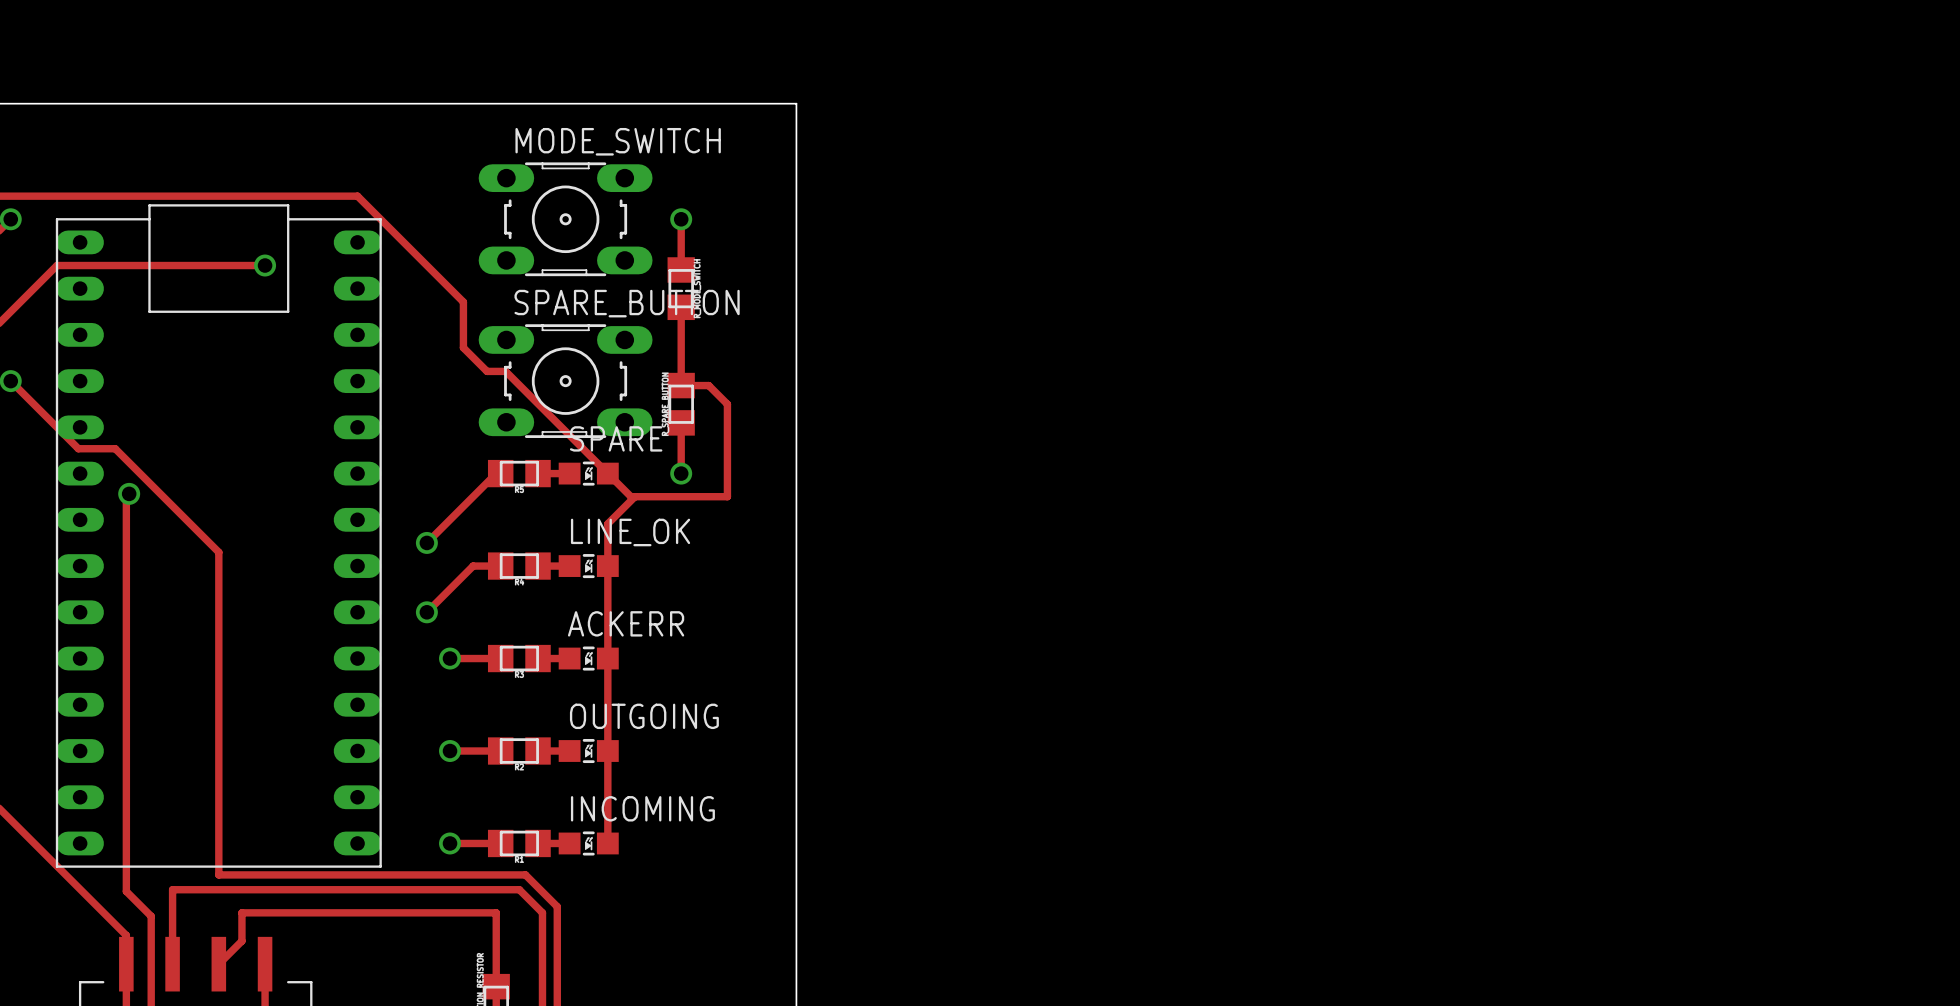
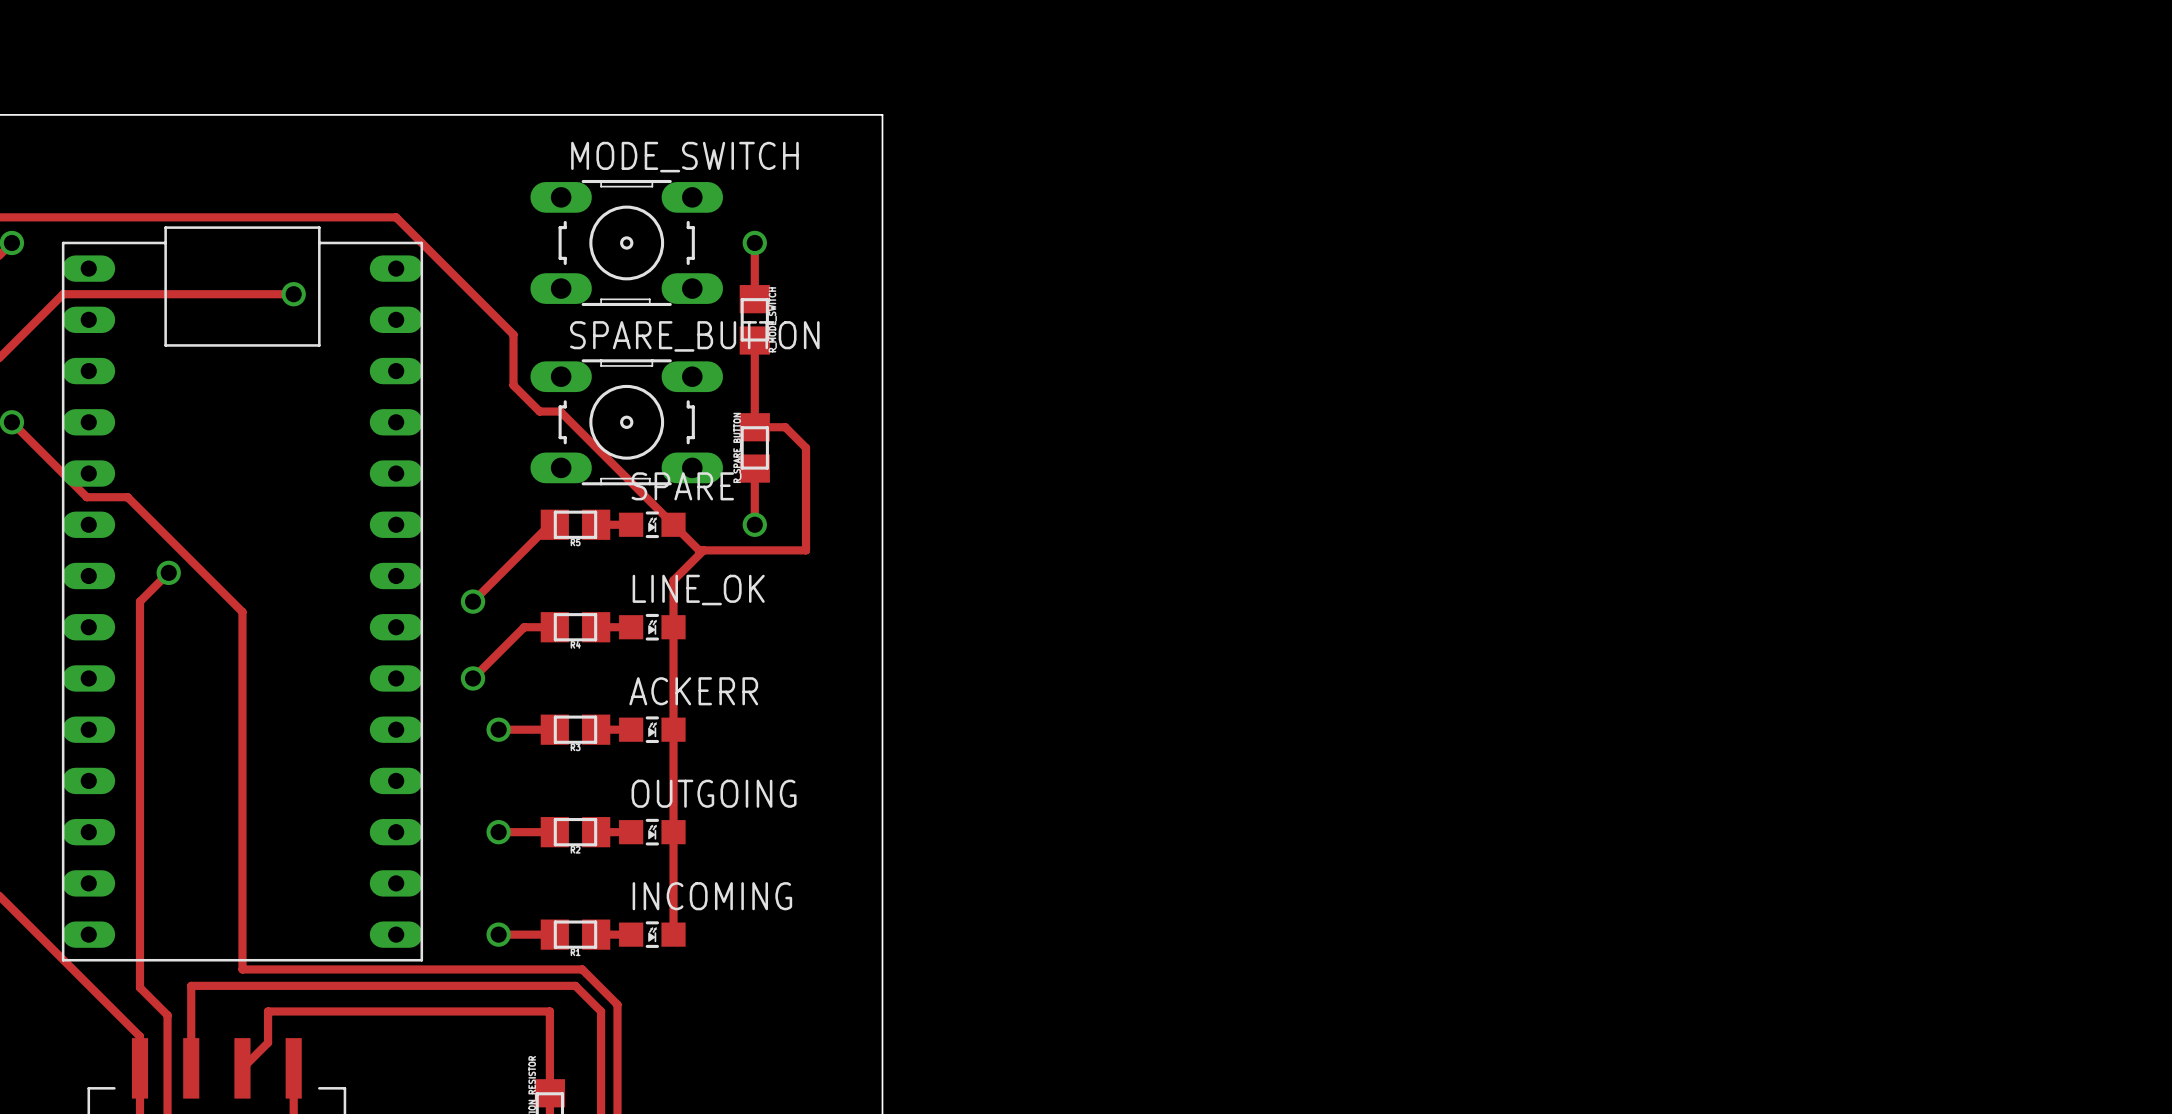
track: (129, 493) (126, 496) (126, 542) -> (168, 572) (140, 601)
via position: (129, 493) -> (168, 572)

